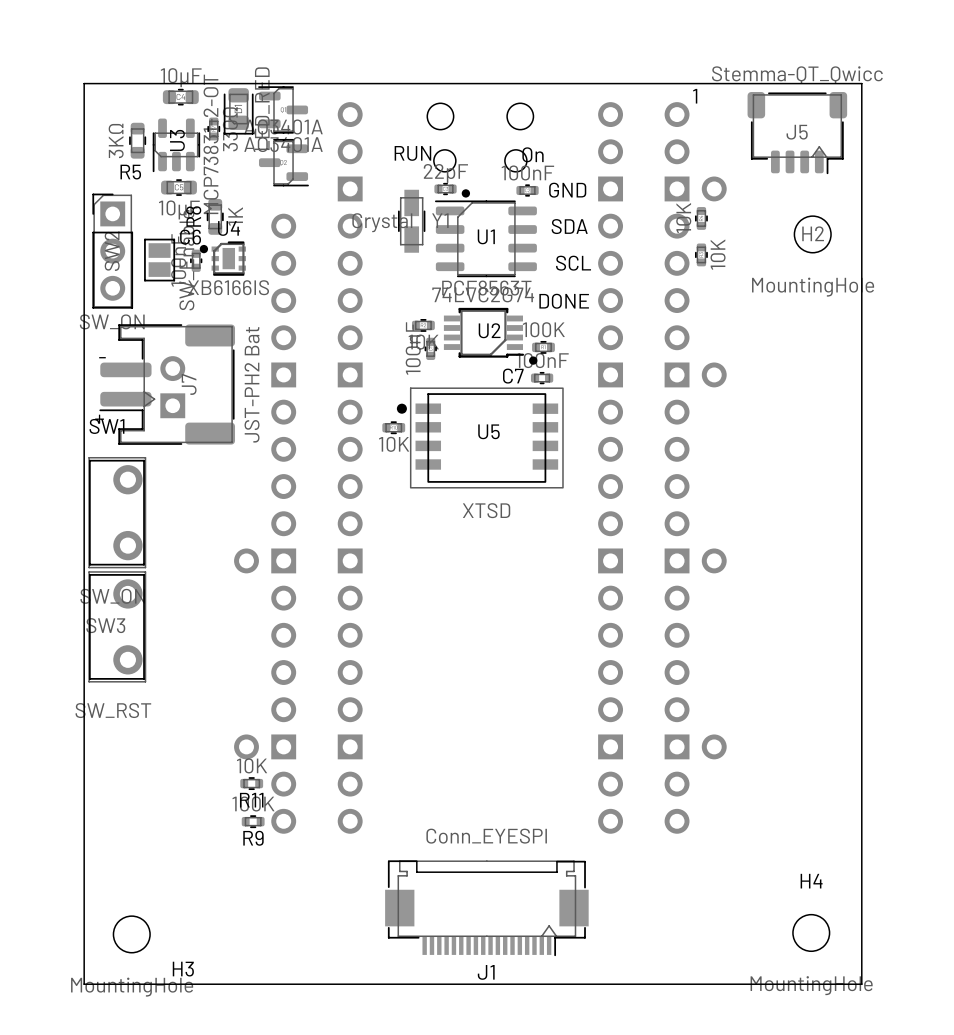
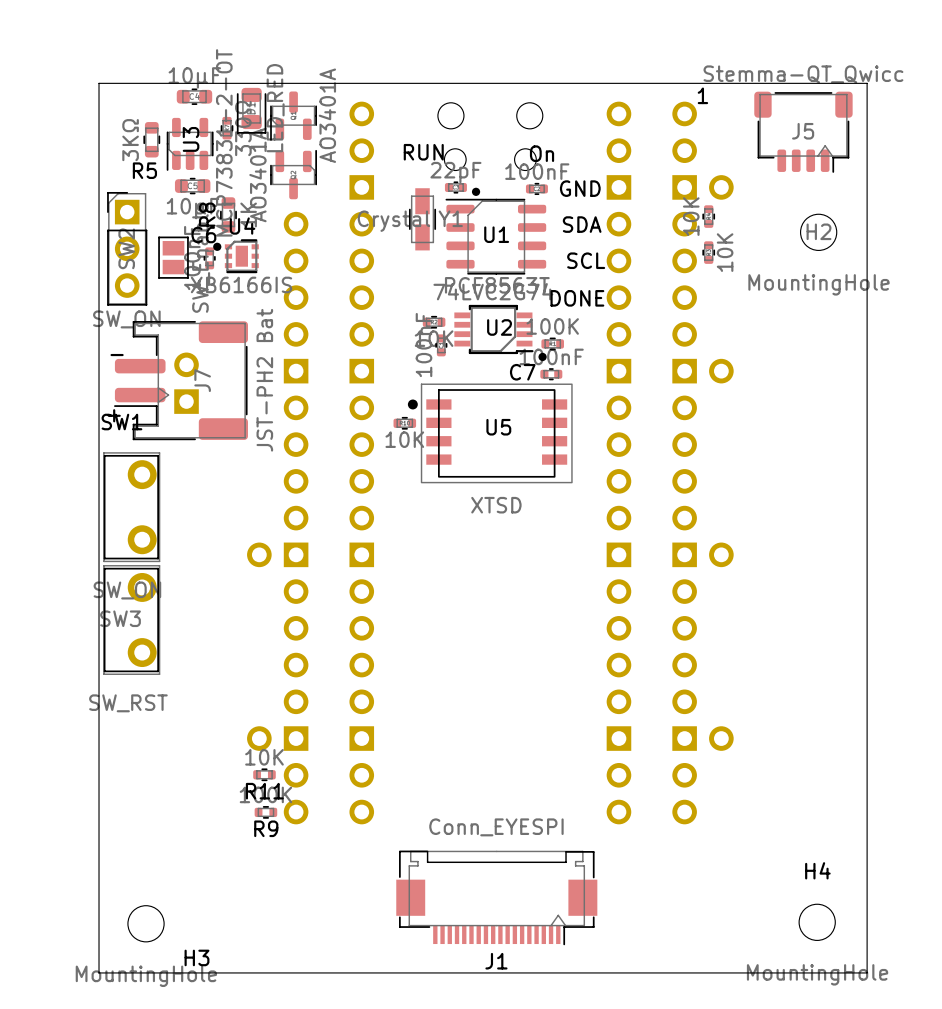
part rotation: 0° (283, 109) -> 90° counterclockwise (293, 116)
part rotation: 0° (283, 162) -> 90° counterclockwise (293, 174)

